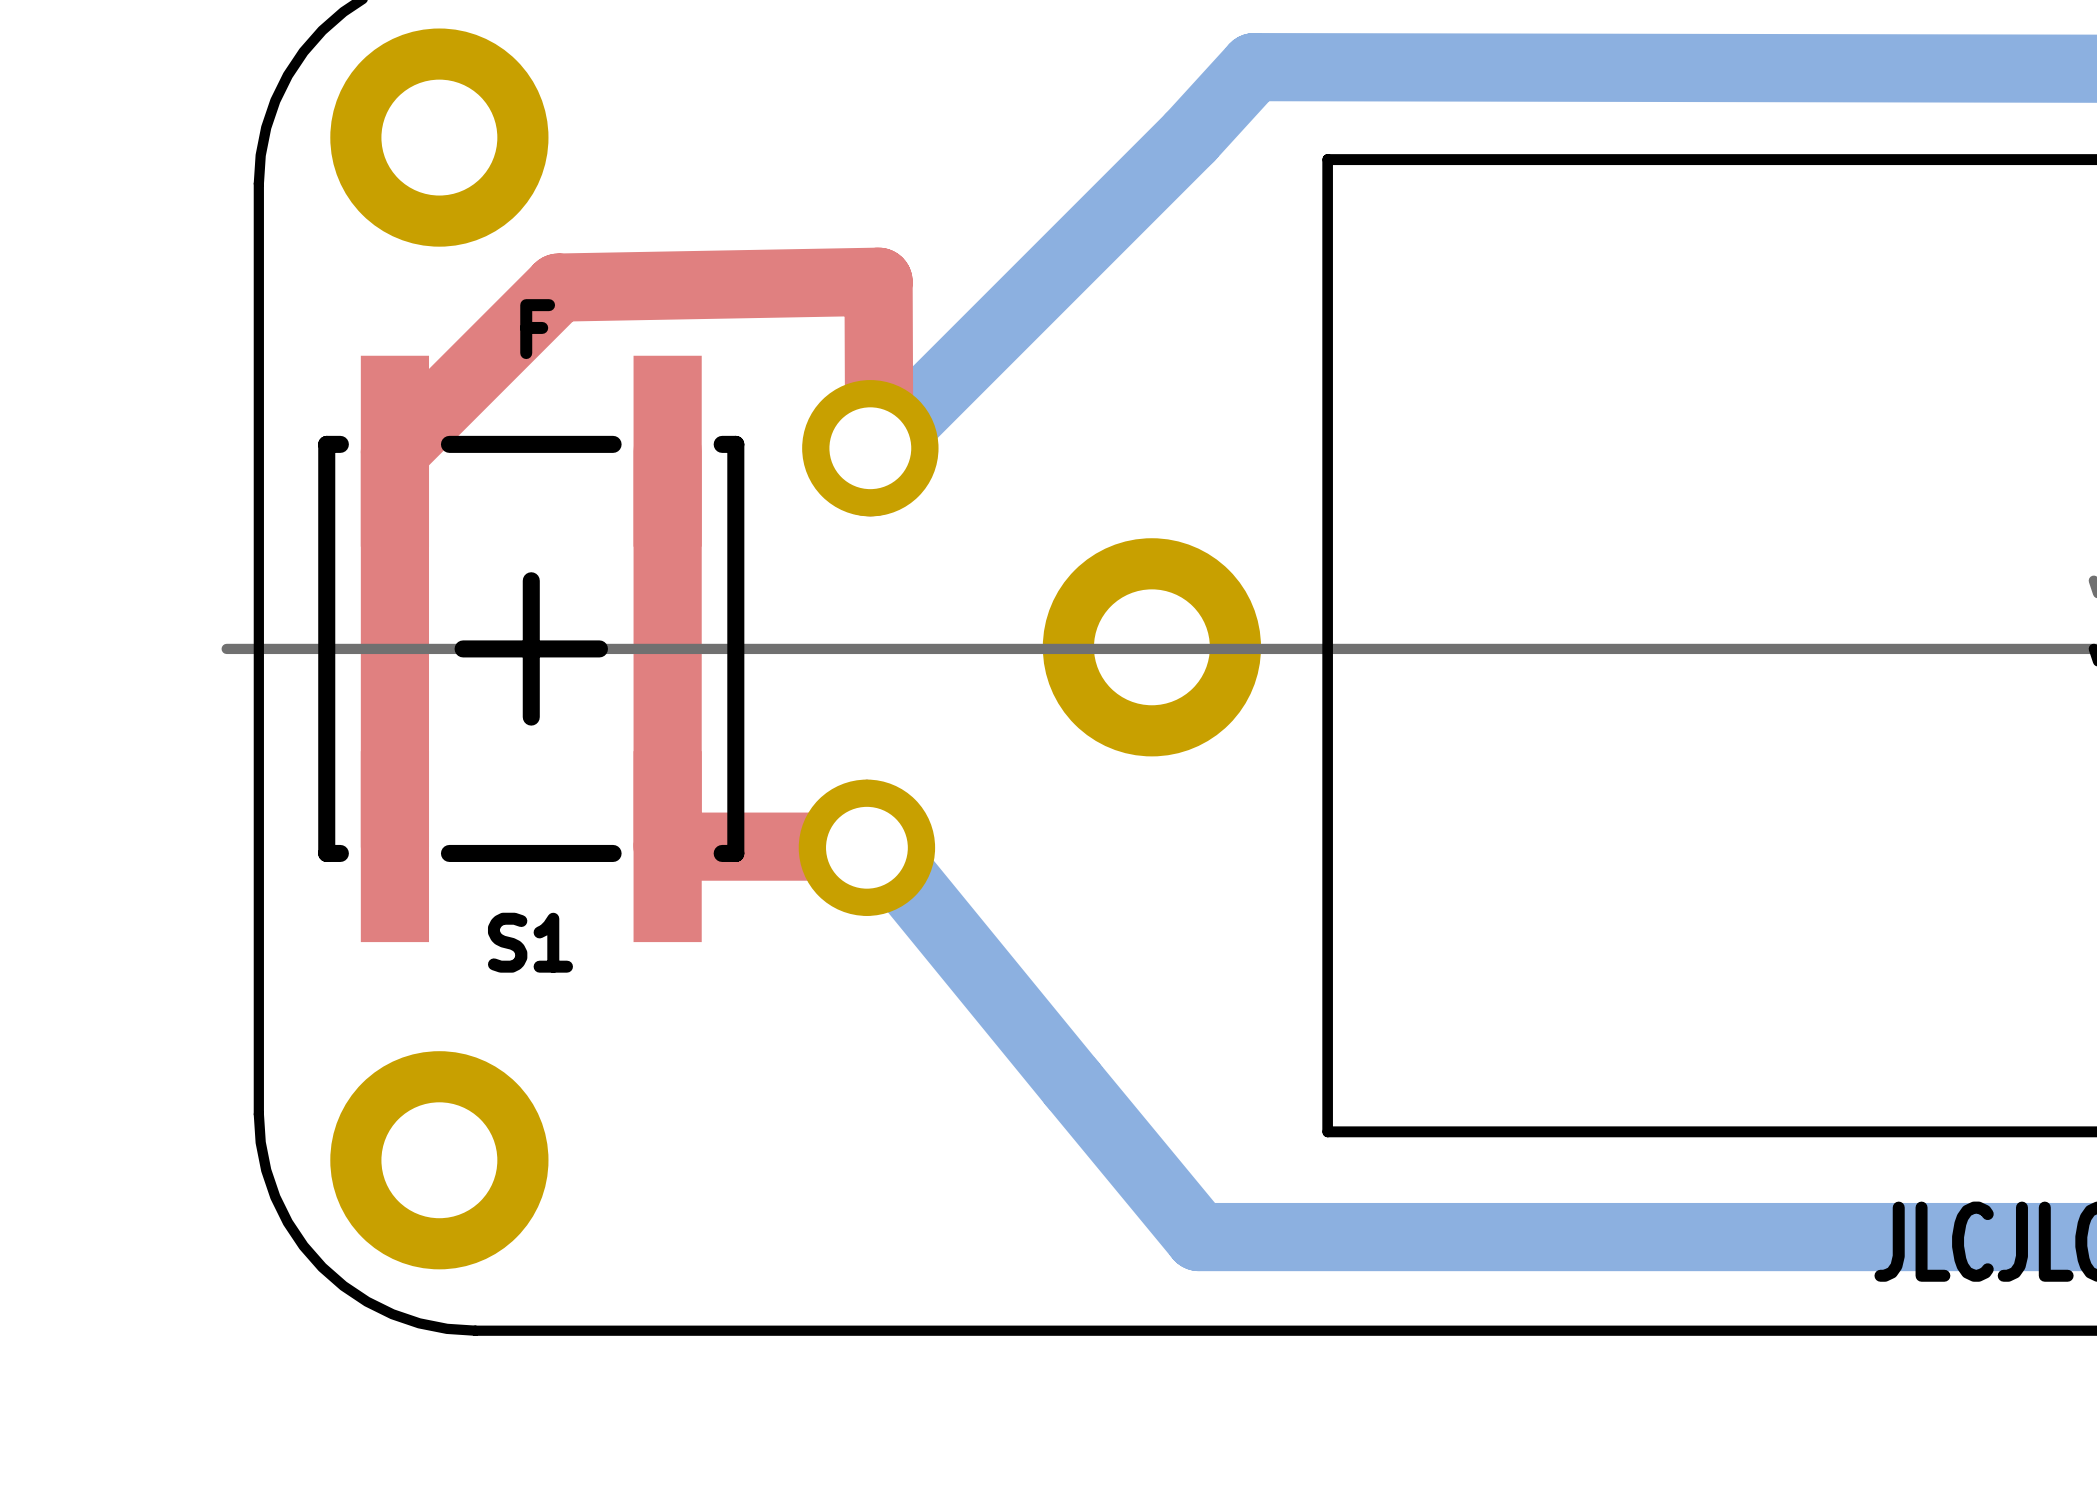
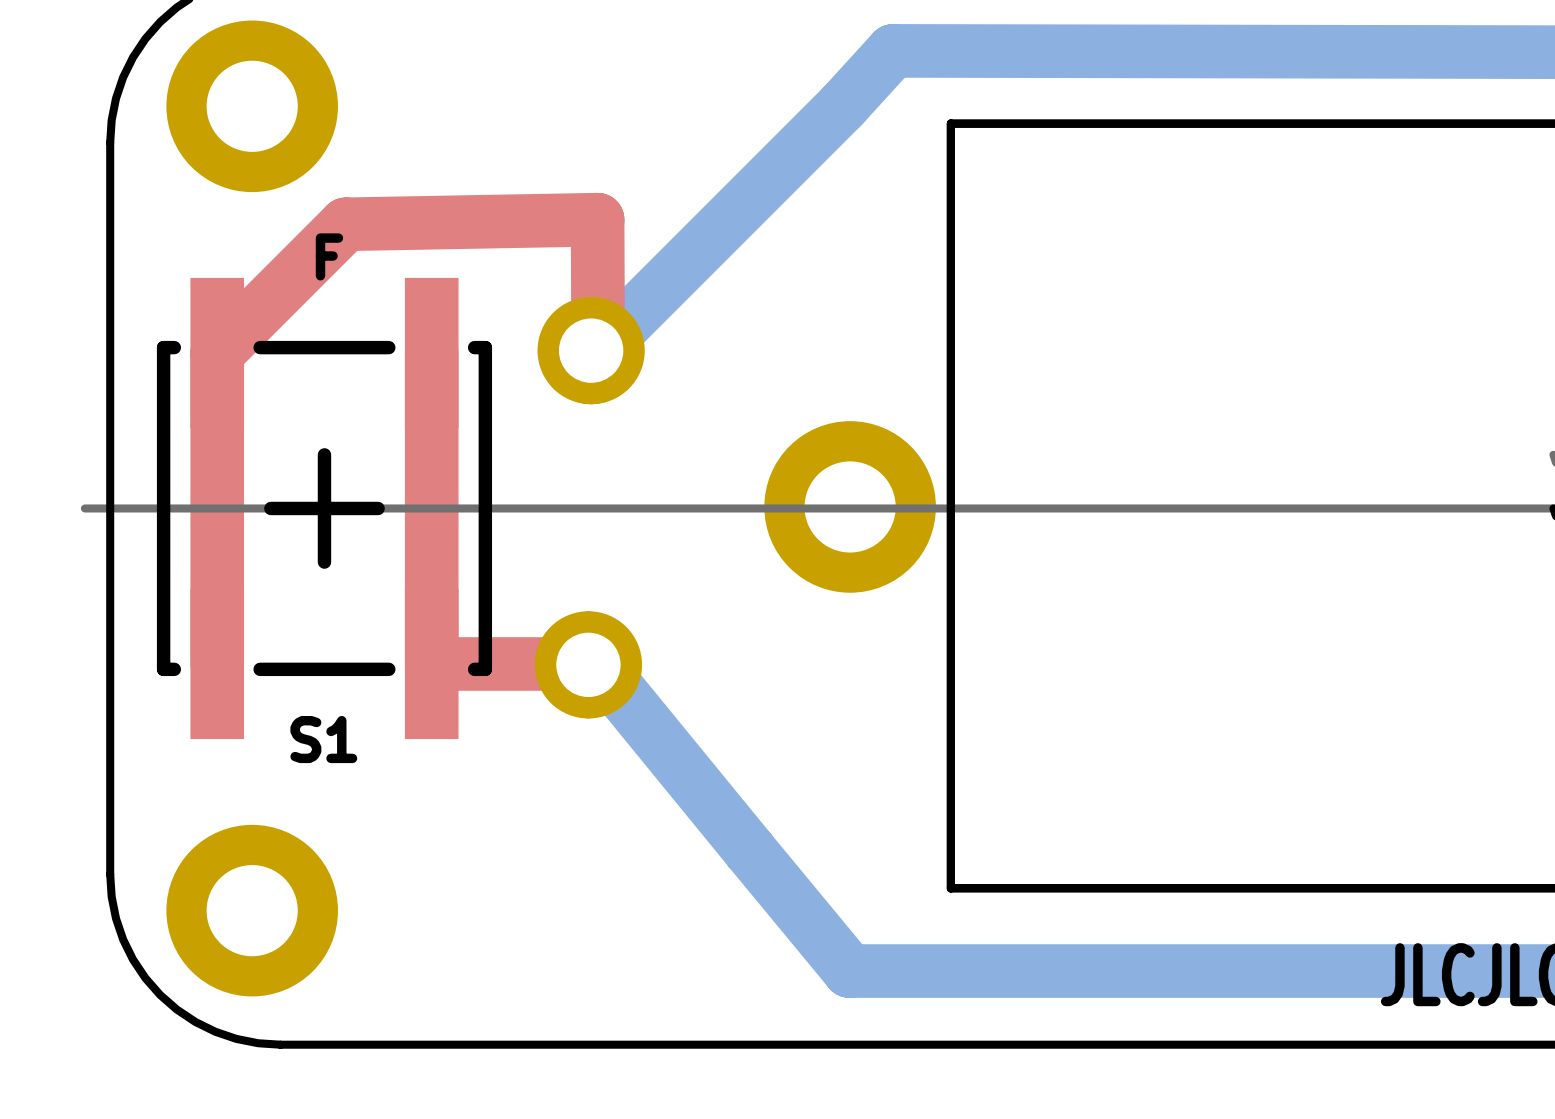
part position: (1151, 647) -> (850, 506)

